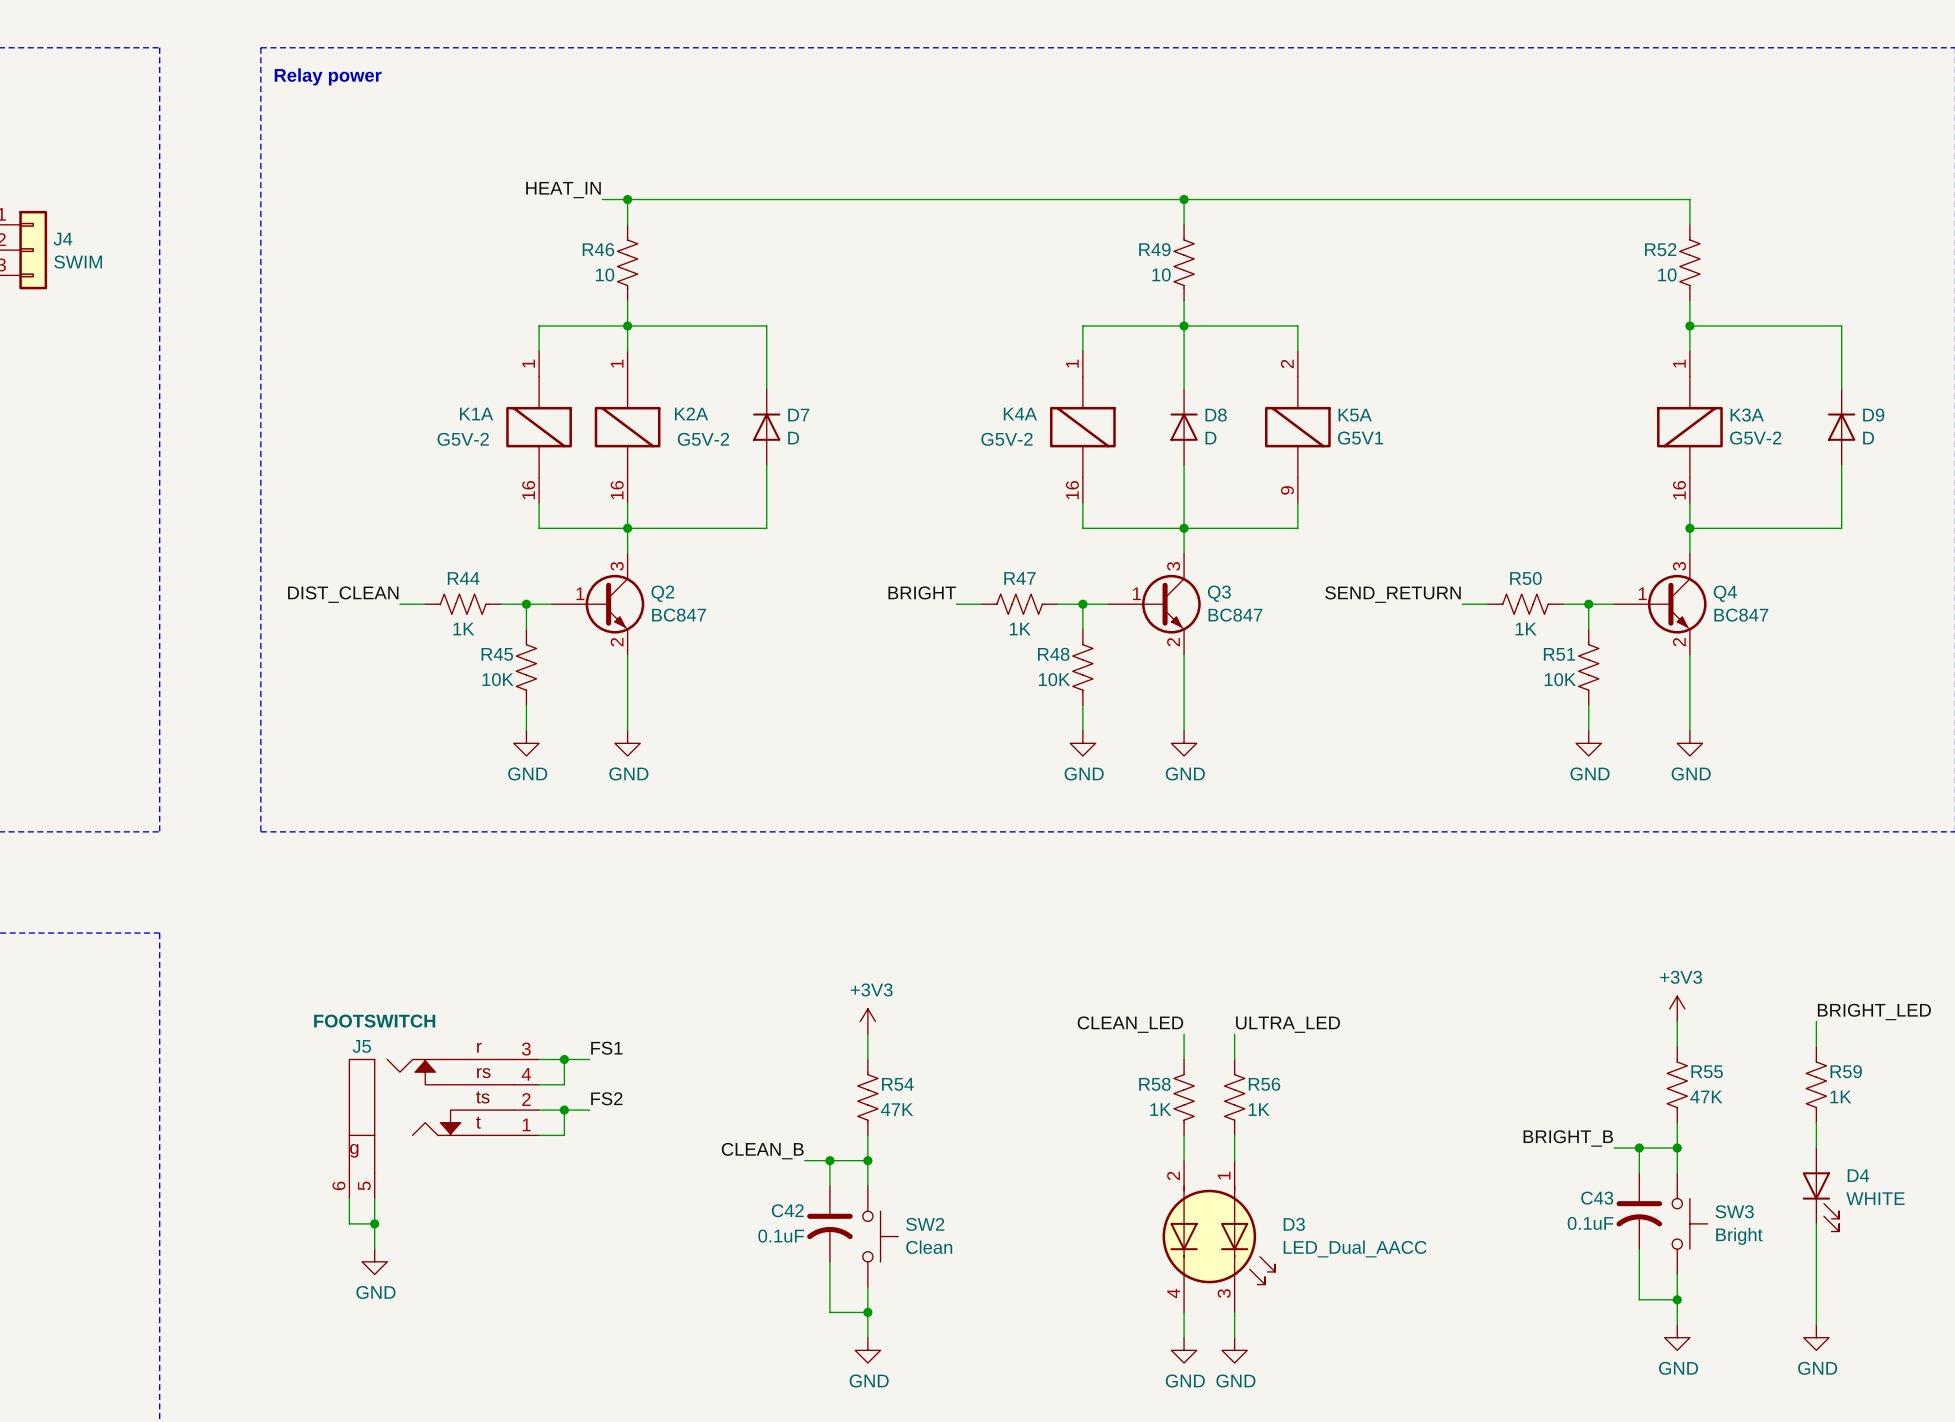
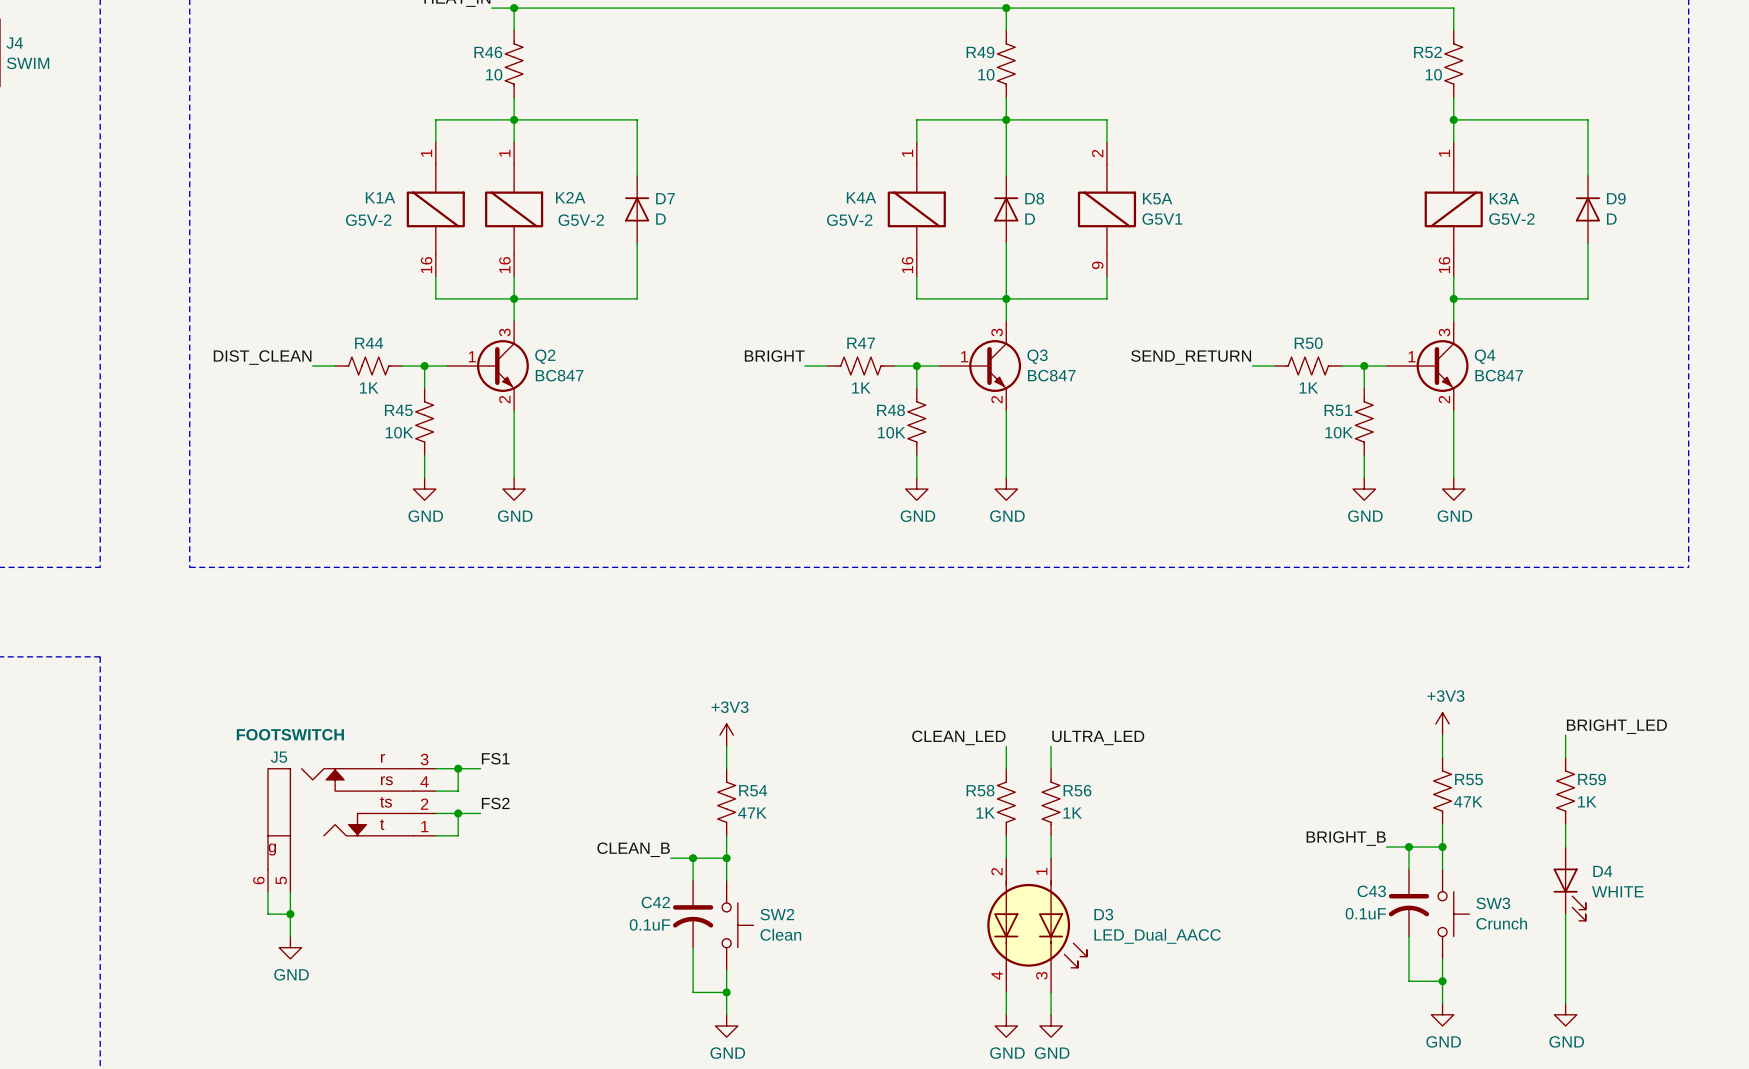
SW3 value: Bright (1739, 1236) -> Crunch (1501, 923)

